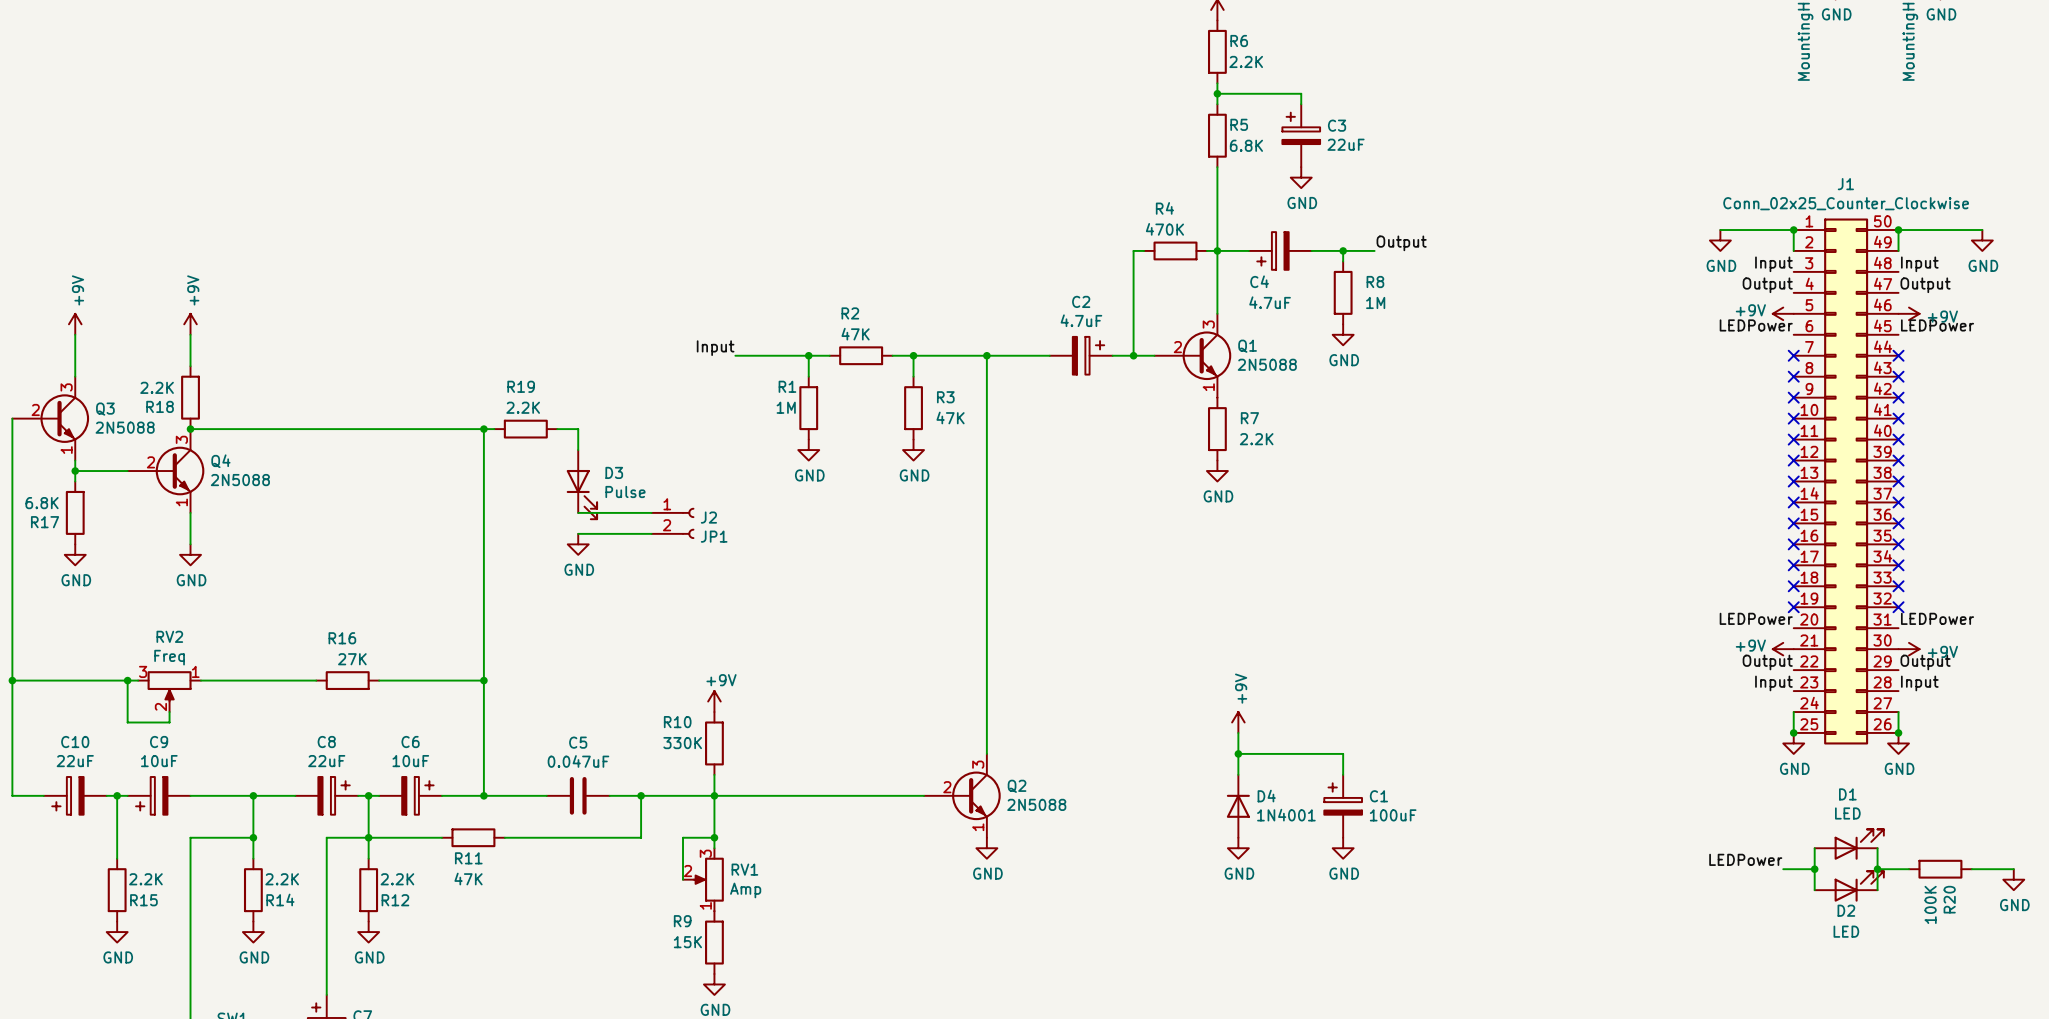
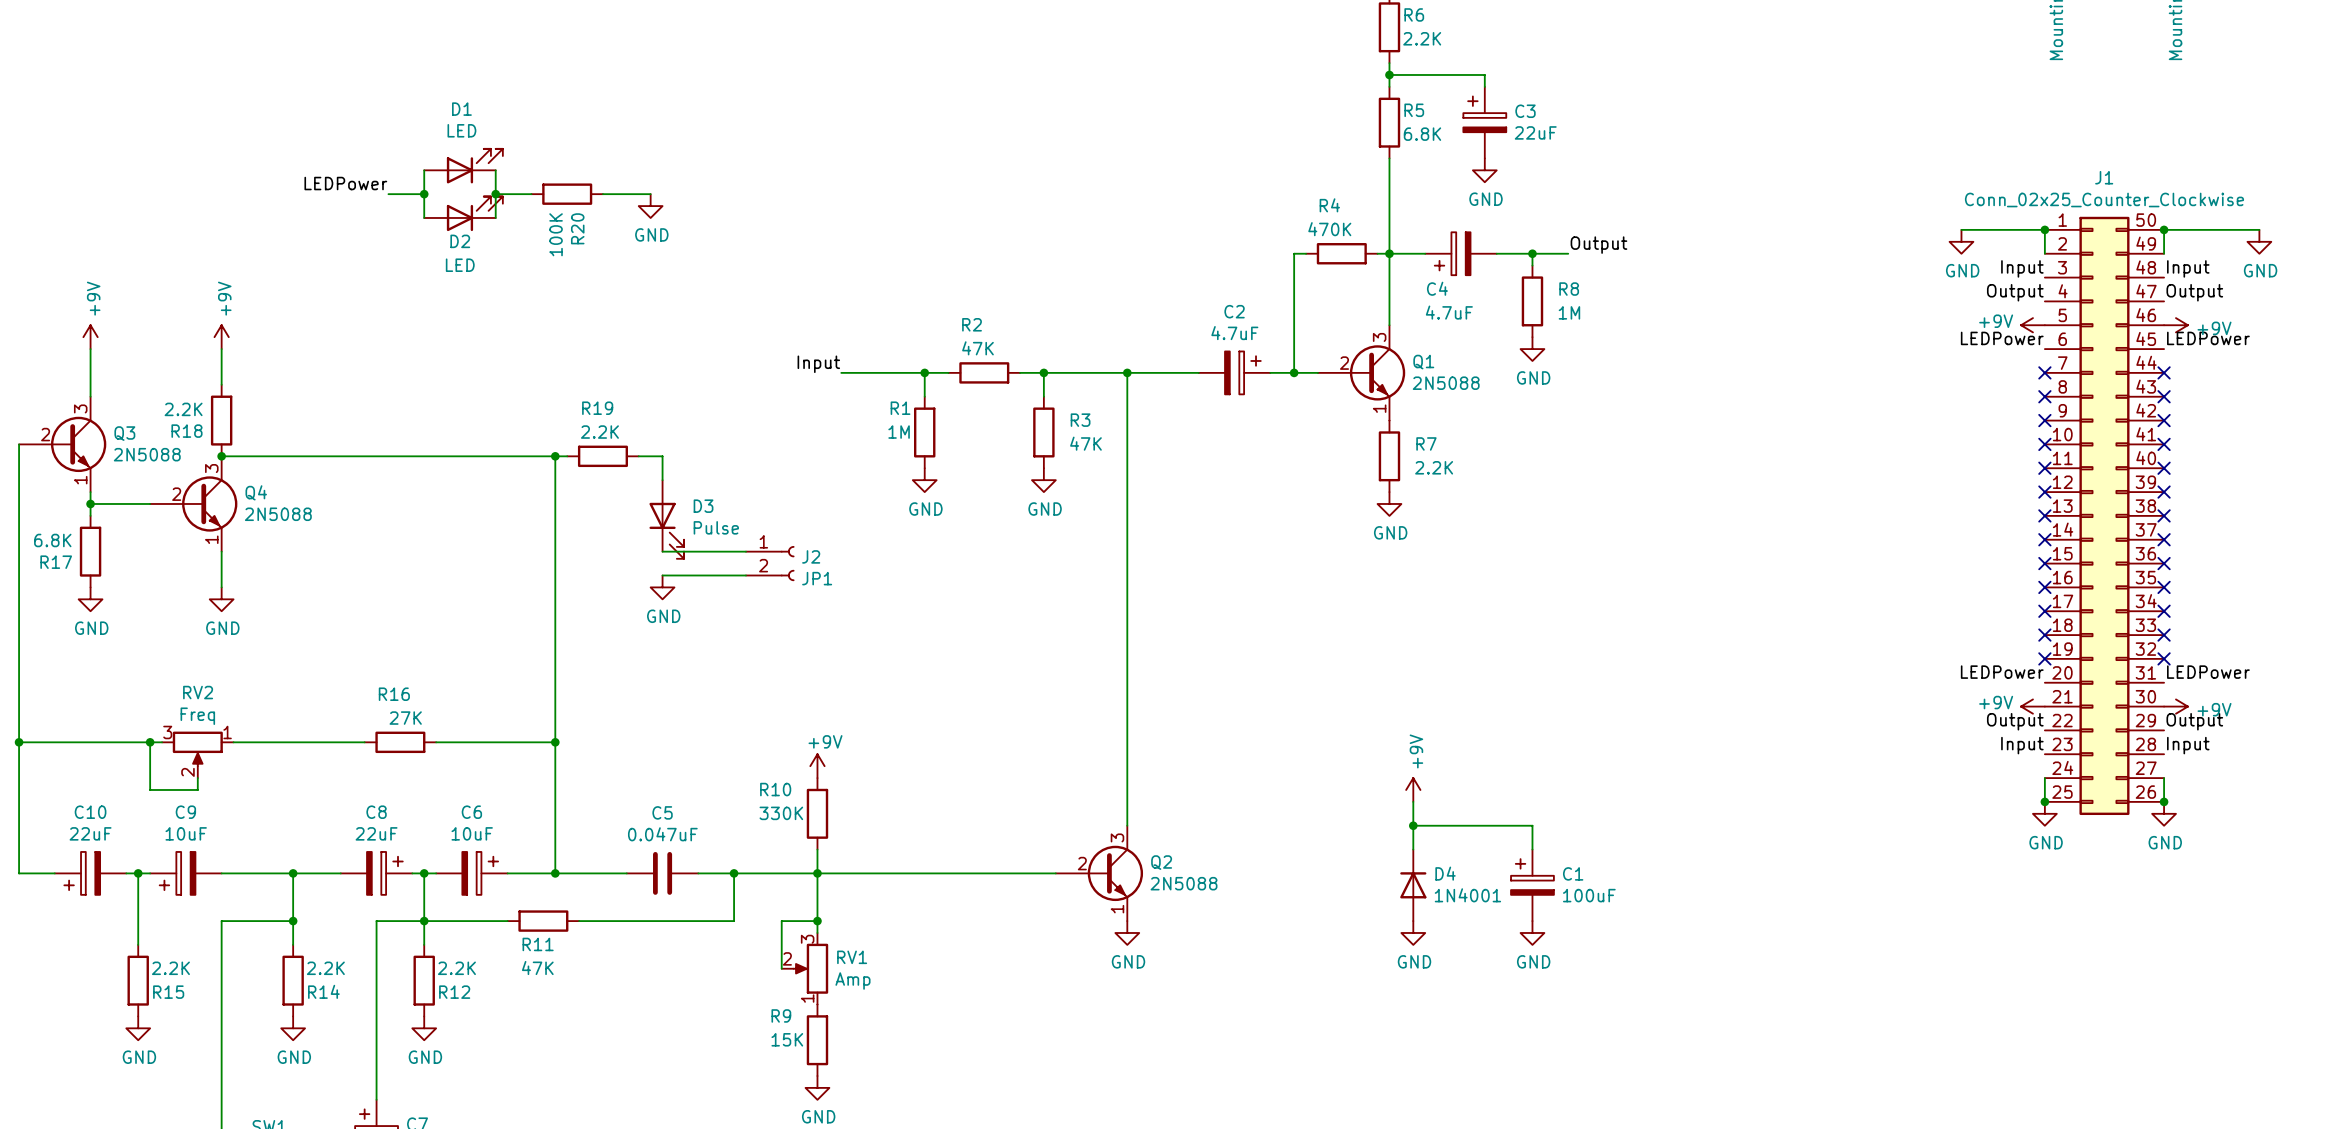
wire: none -> (424, 170) (424, 217)
wire: none -> (495, 170) (495, 217)
label: none -> LEDPower (345, 183)
wire: none -> (388, 194) (424, 194)
junction: none -> (424, 194)
wire: none -> (495, 194) (531, 194)
junction: none -> (495, 194)
wire: none -> (602, 194) (650, 194)
power symbol: none -> GND (650, 206)
D1 position: (1849, 844) -> (463, 166)
wire: (1814, 848) (1814, 890) -> none
wire: (1877, 848) (1877, 890) -> none
label: LEDPower (1745, 859) -> none
wire: (1783, 869) (1814, 869) -> none
junction: (1814, 869) -> none
wire: (1877, 869) (1908, 869) -> none
junction: (1877, 869) -> none
R20 position: (1940, 869) -> (567, 194)
wire: (1971, 869) (2013, 869) -> none
power symbol: GND (2013, 879) -> none
D2 position: (1849, 886) -> (463, 213)

